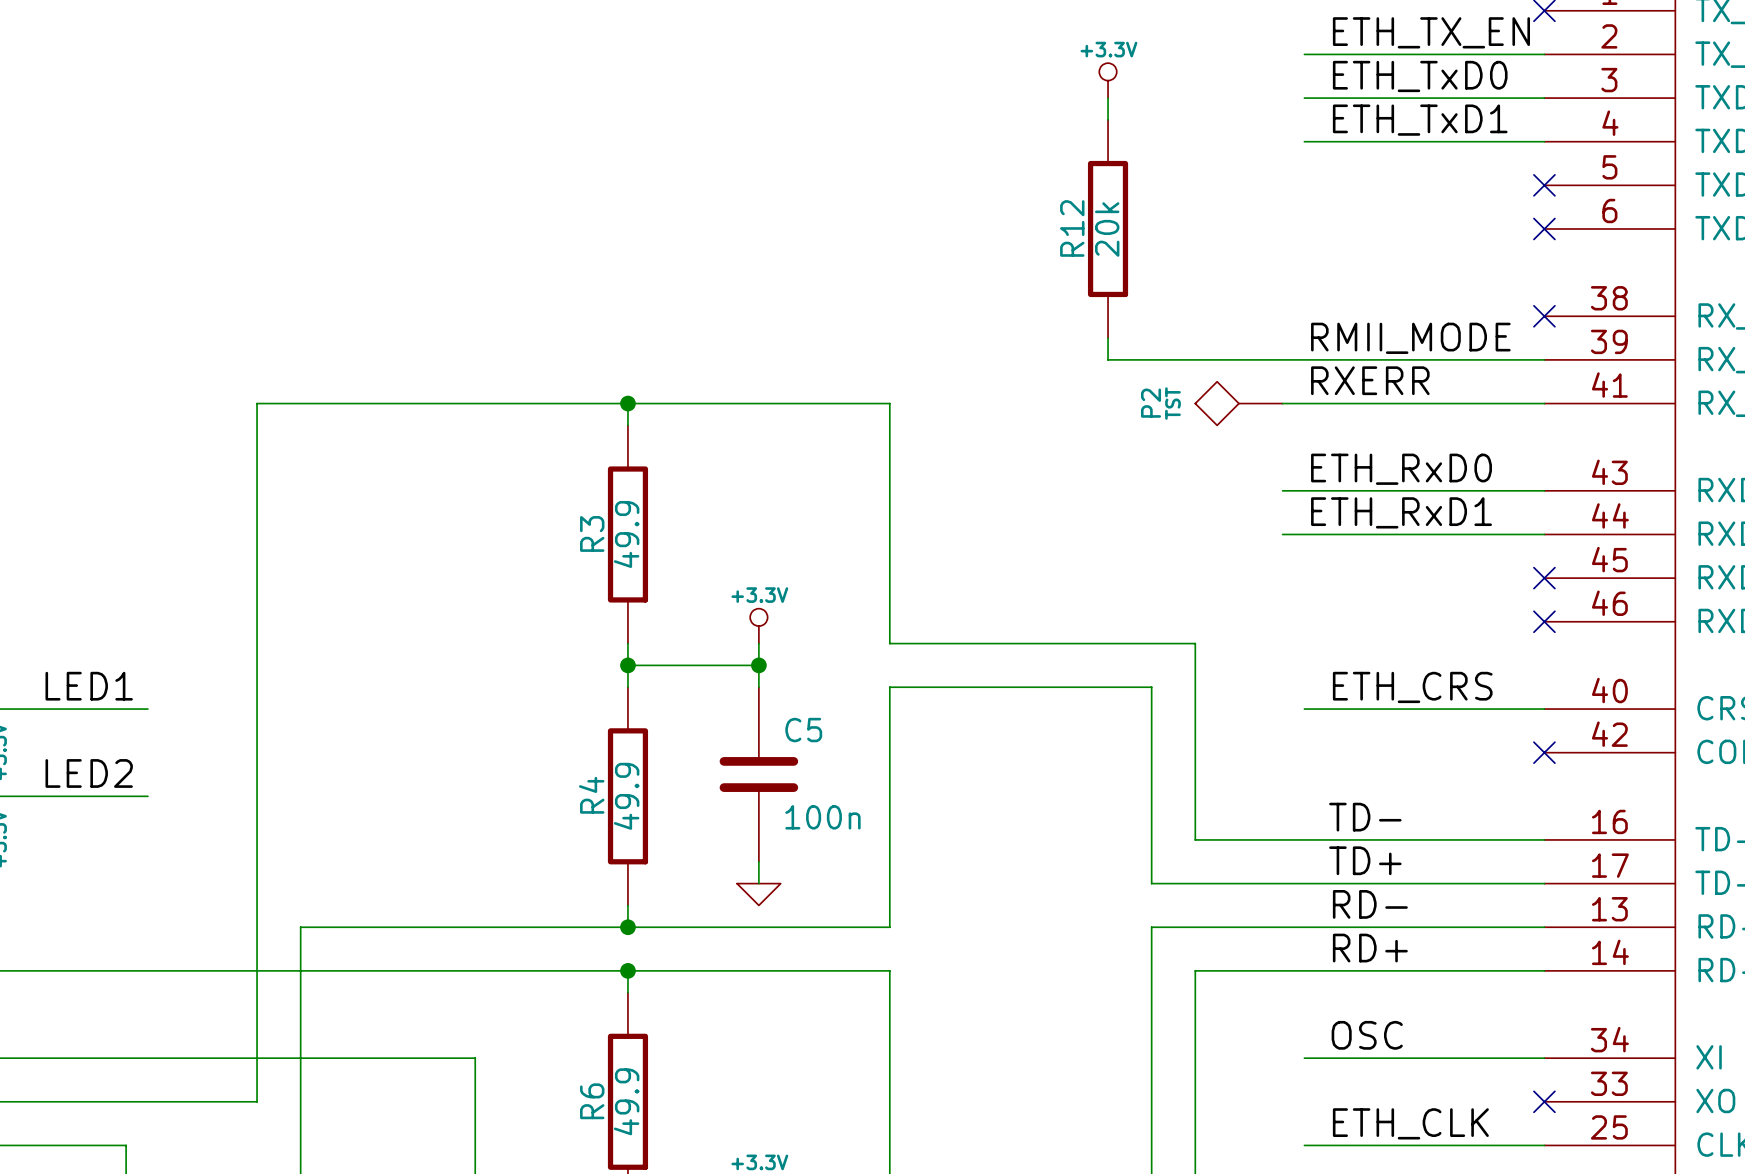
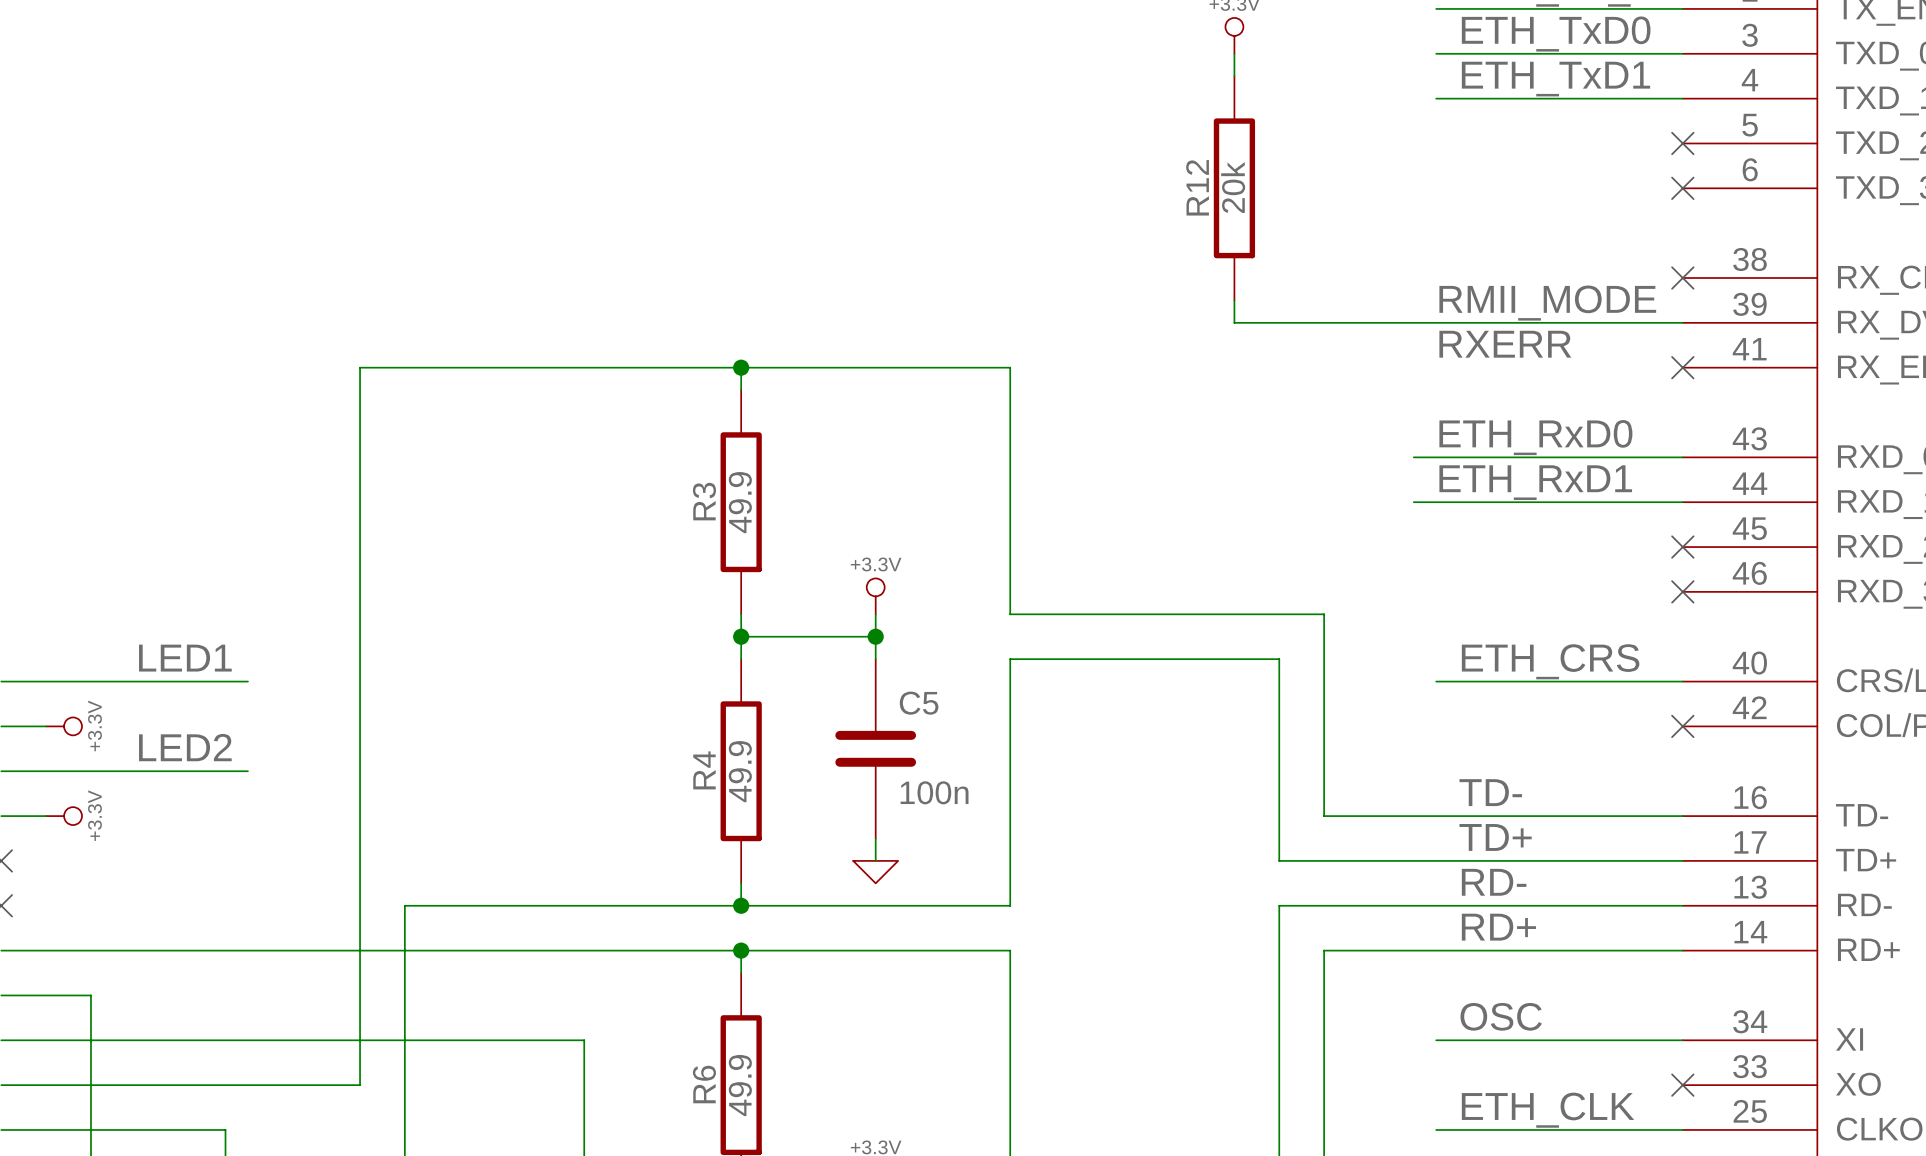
P2: TST (1238, 403) -> none
wire: (1282, 403) (1544, 403) -> none
no-connect mark: none -> (1682, 367)

